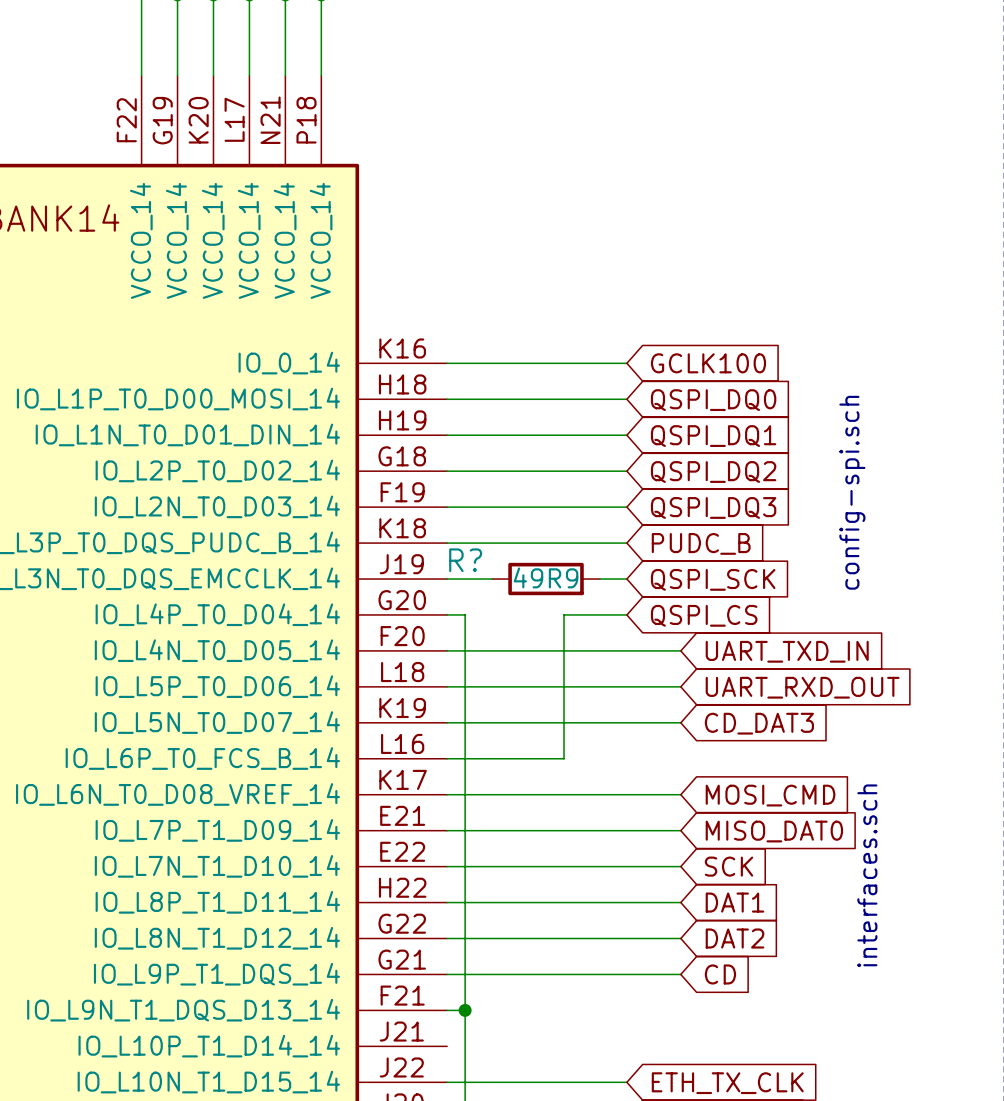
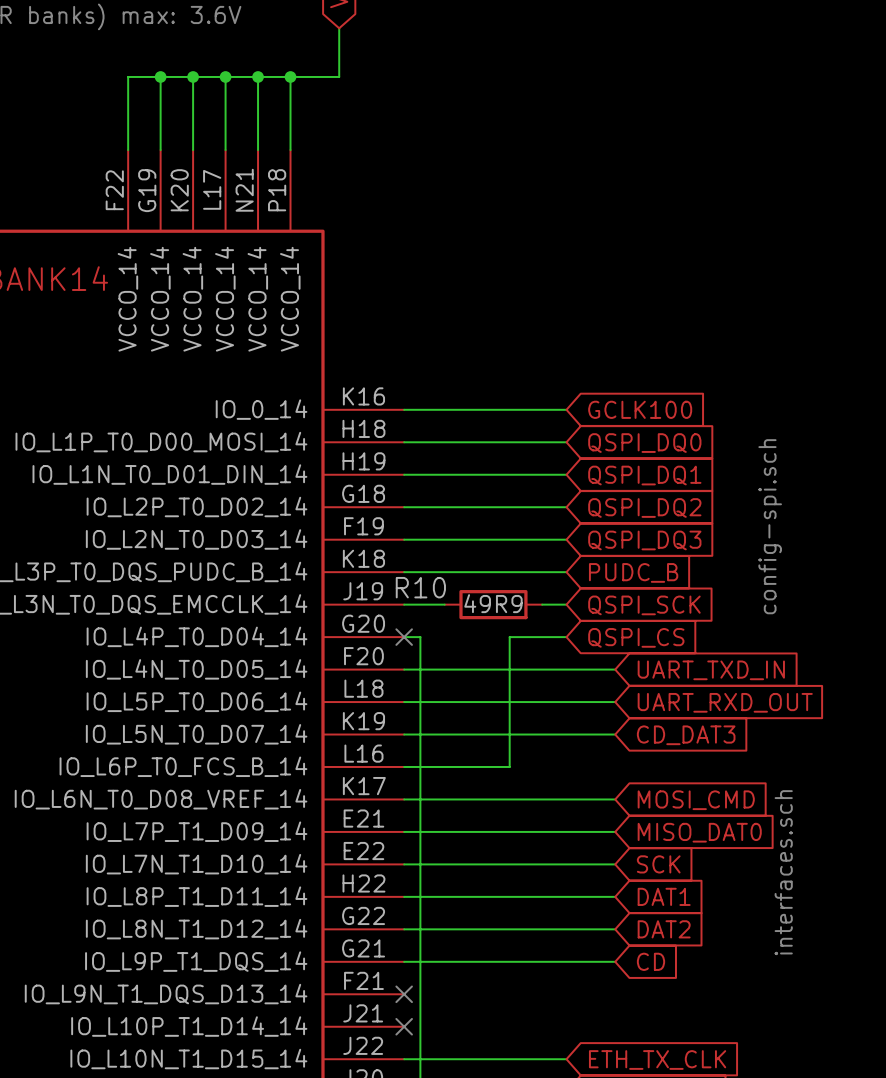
R? name: R? (465, 560) -> R10 (420, 587)
no-connect mark: none -> (404, 637)
wire: (447, 1010) (465, 1010) -> none
no-connect mark: none -> (404, 994)
junction: (465, 1010) -> none
no-connect mark: none -> (404, 1026)

